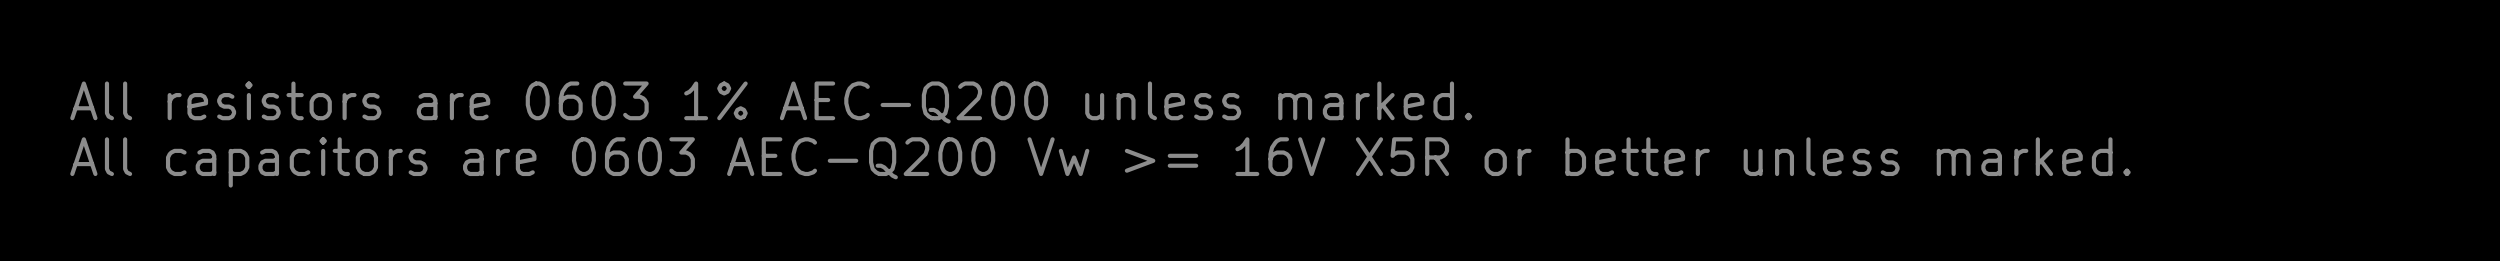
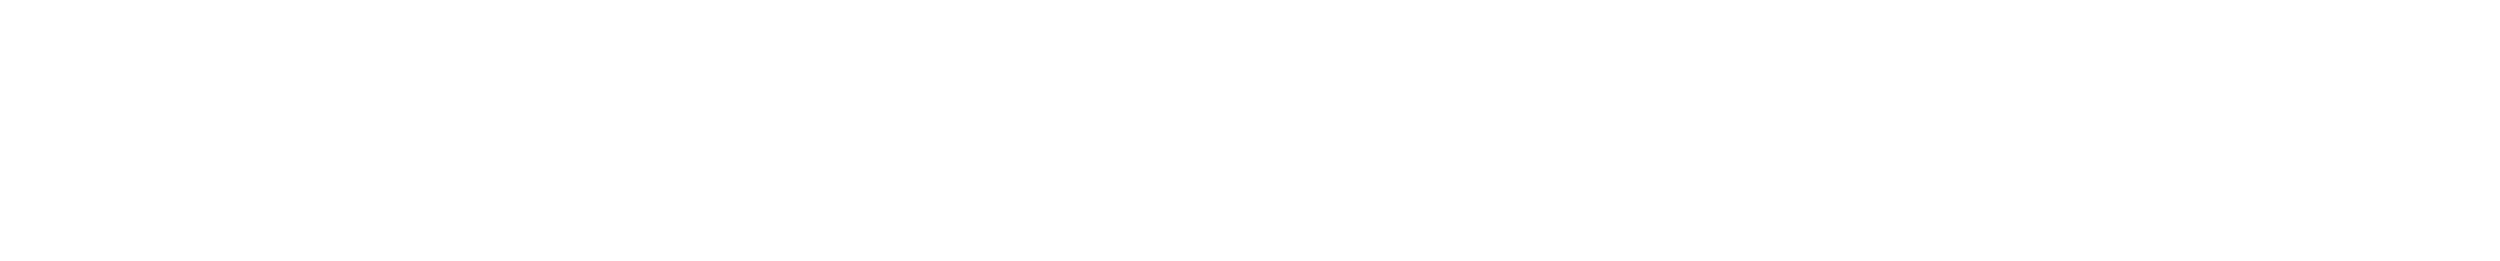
text: All resistors are 0603 1% AEC-Q200 unless marked. (771, 102) -> none
text: All capacitors are 0603 AEC-Q200 Vw >= 16V X5R or better unless marked. (1100, 162) -> none

